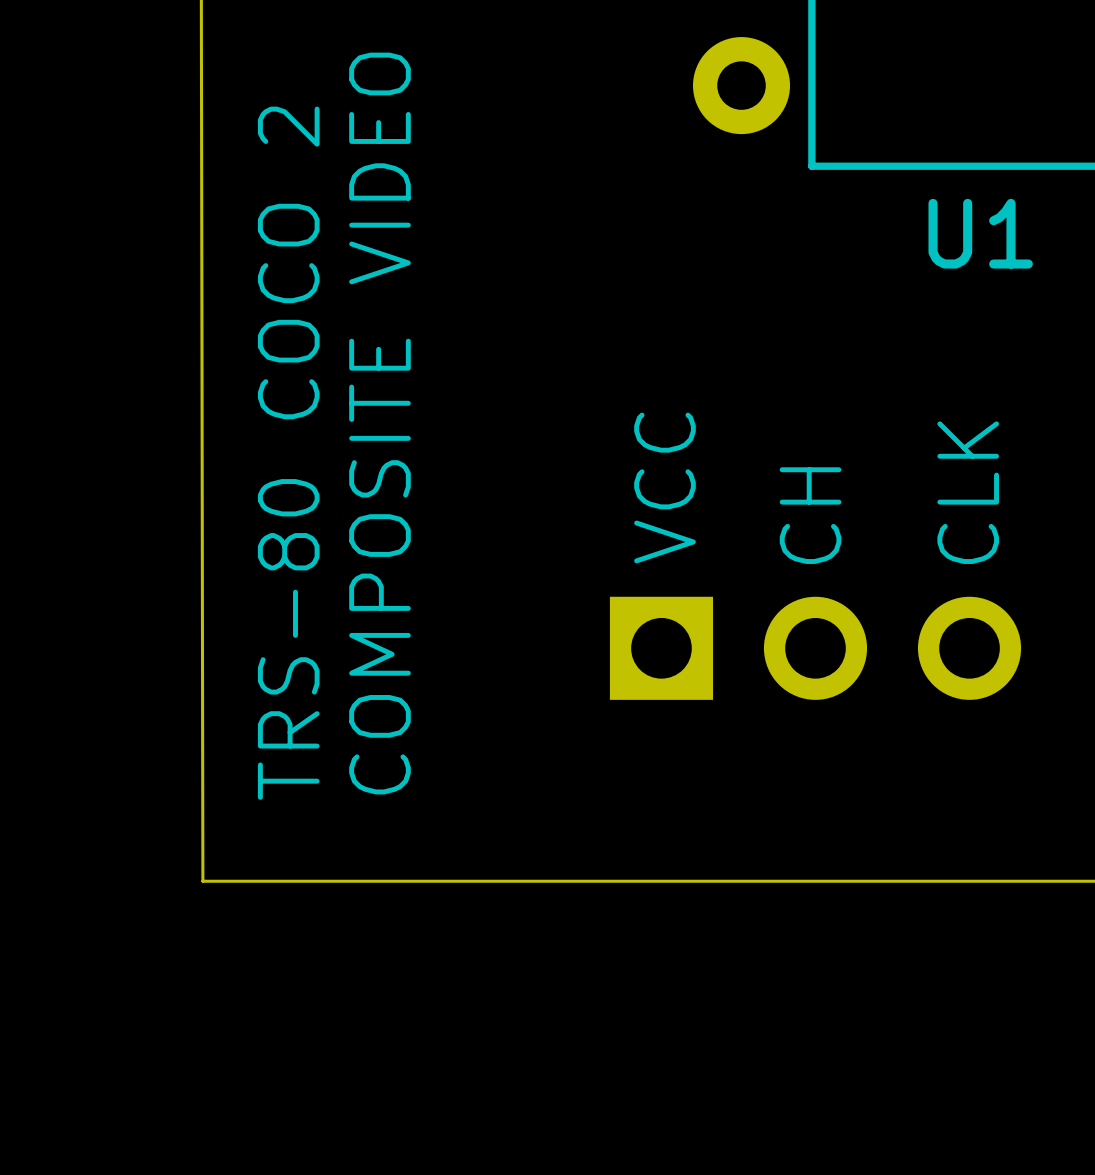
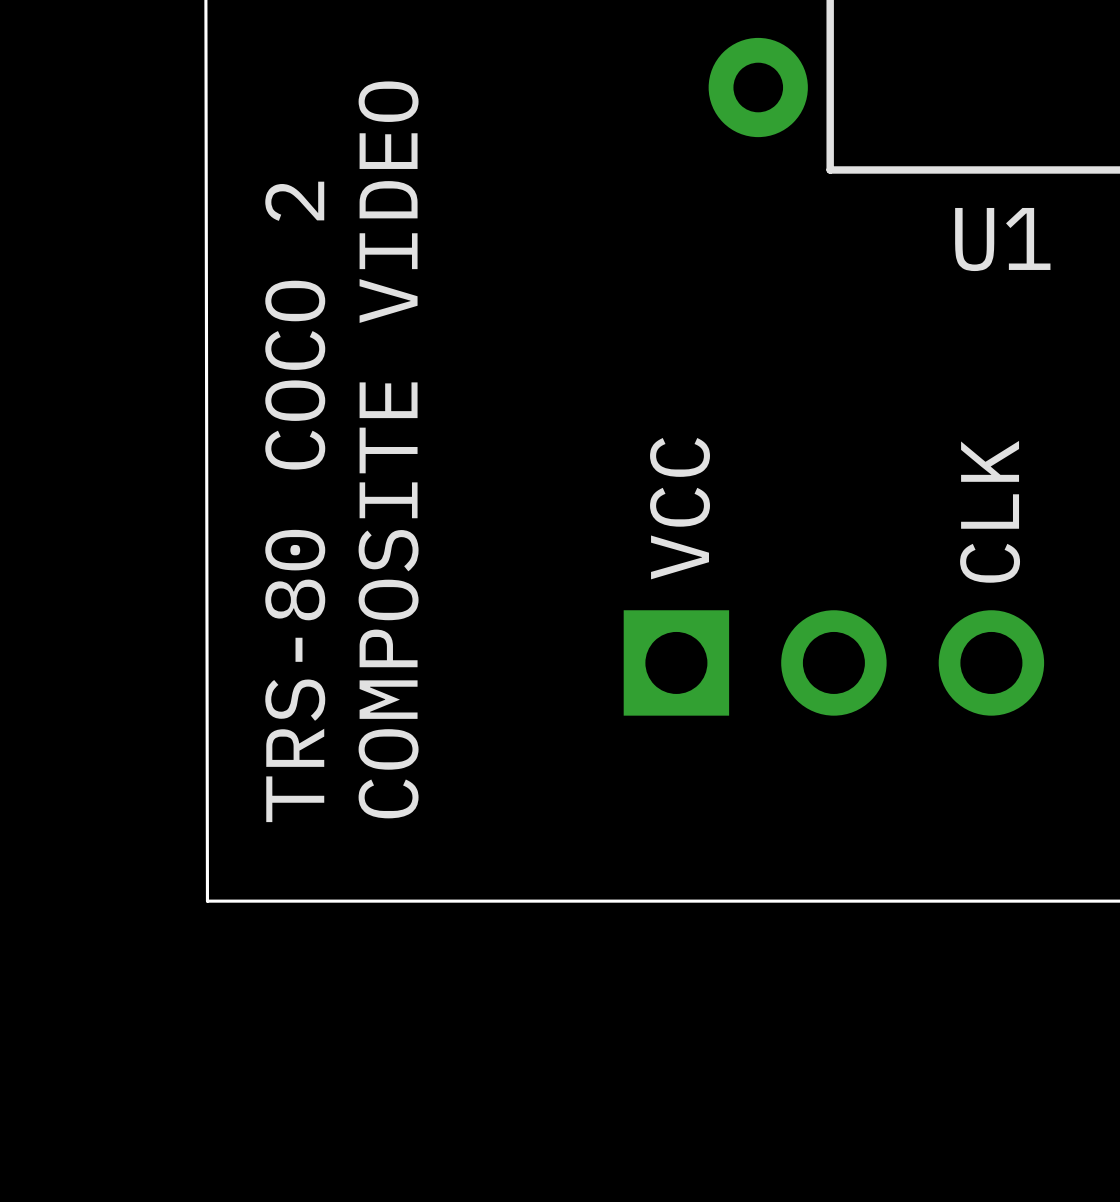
text: CH (810, 515) -> none

